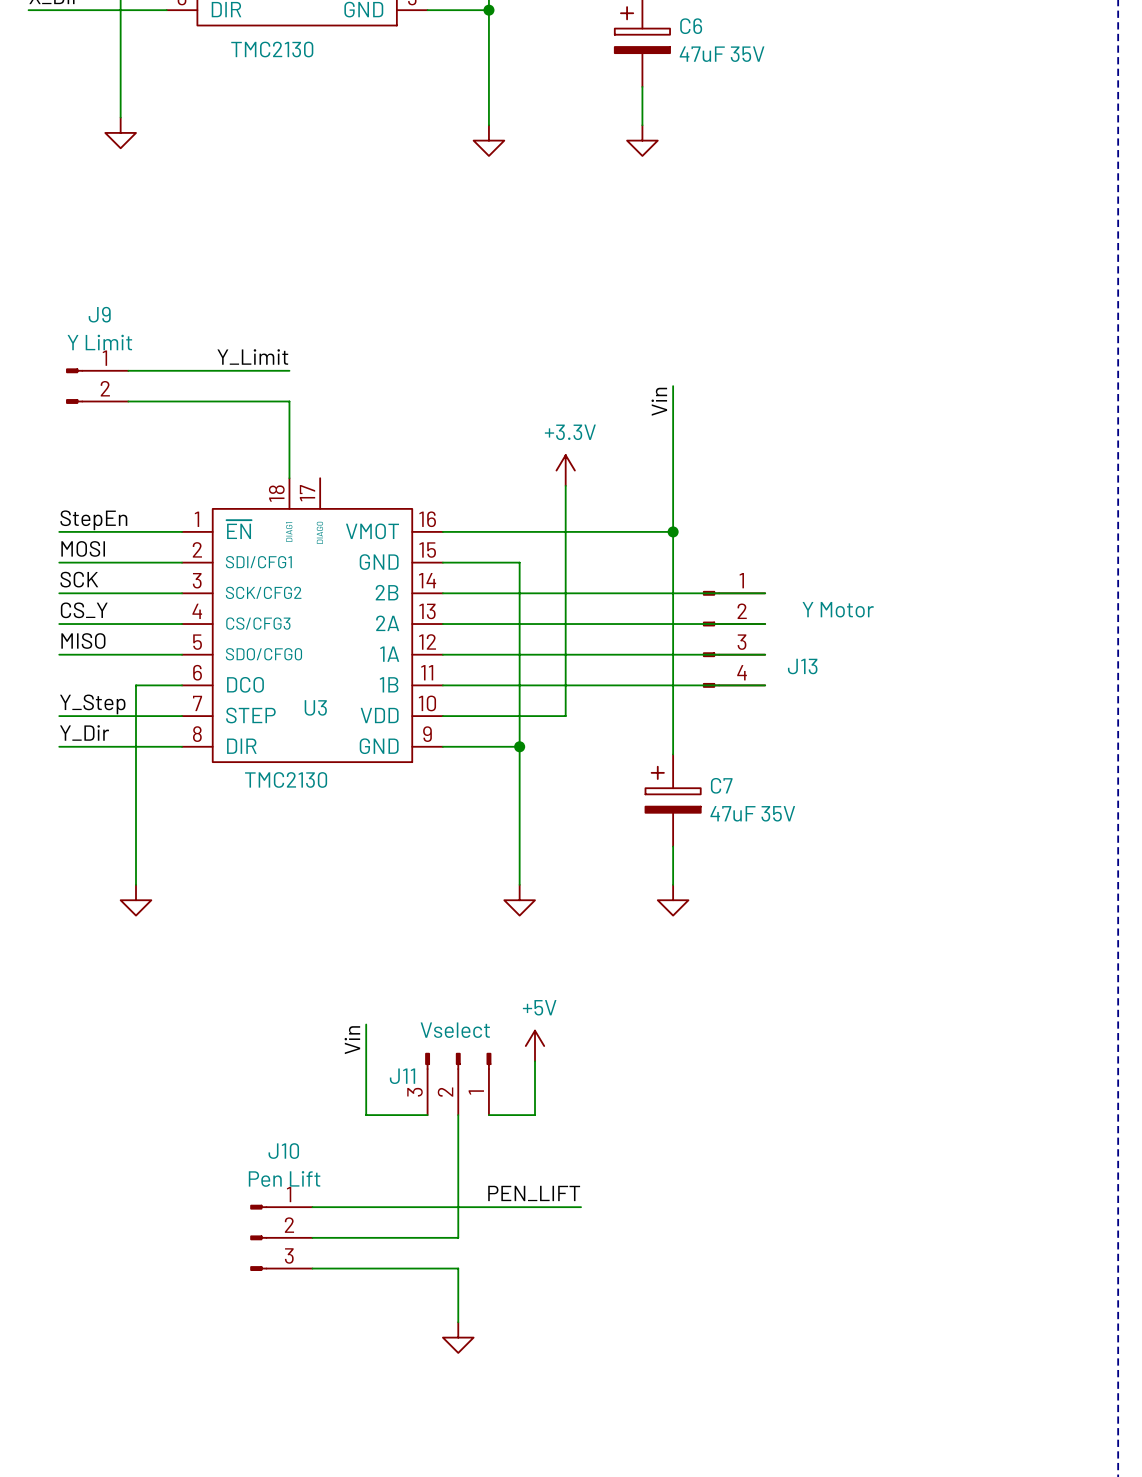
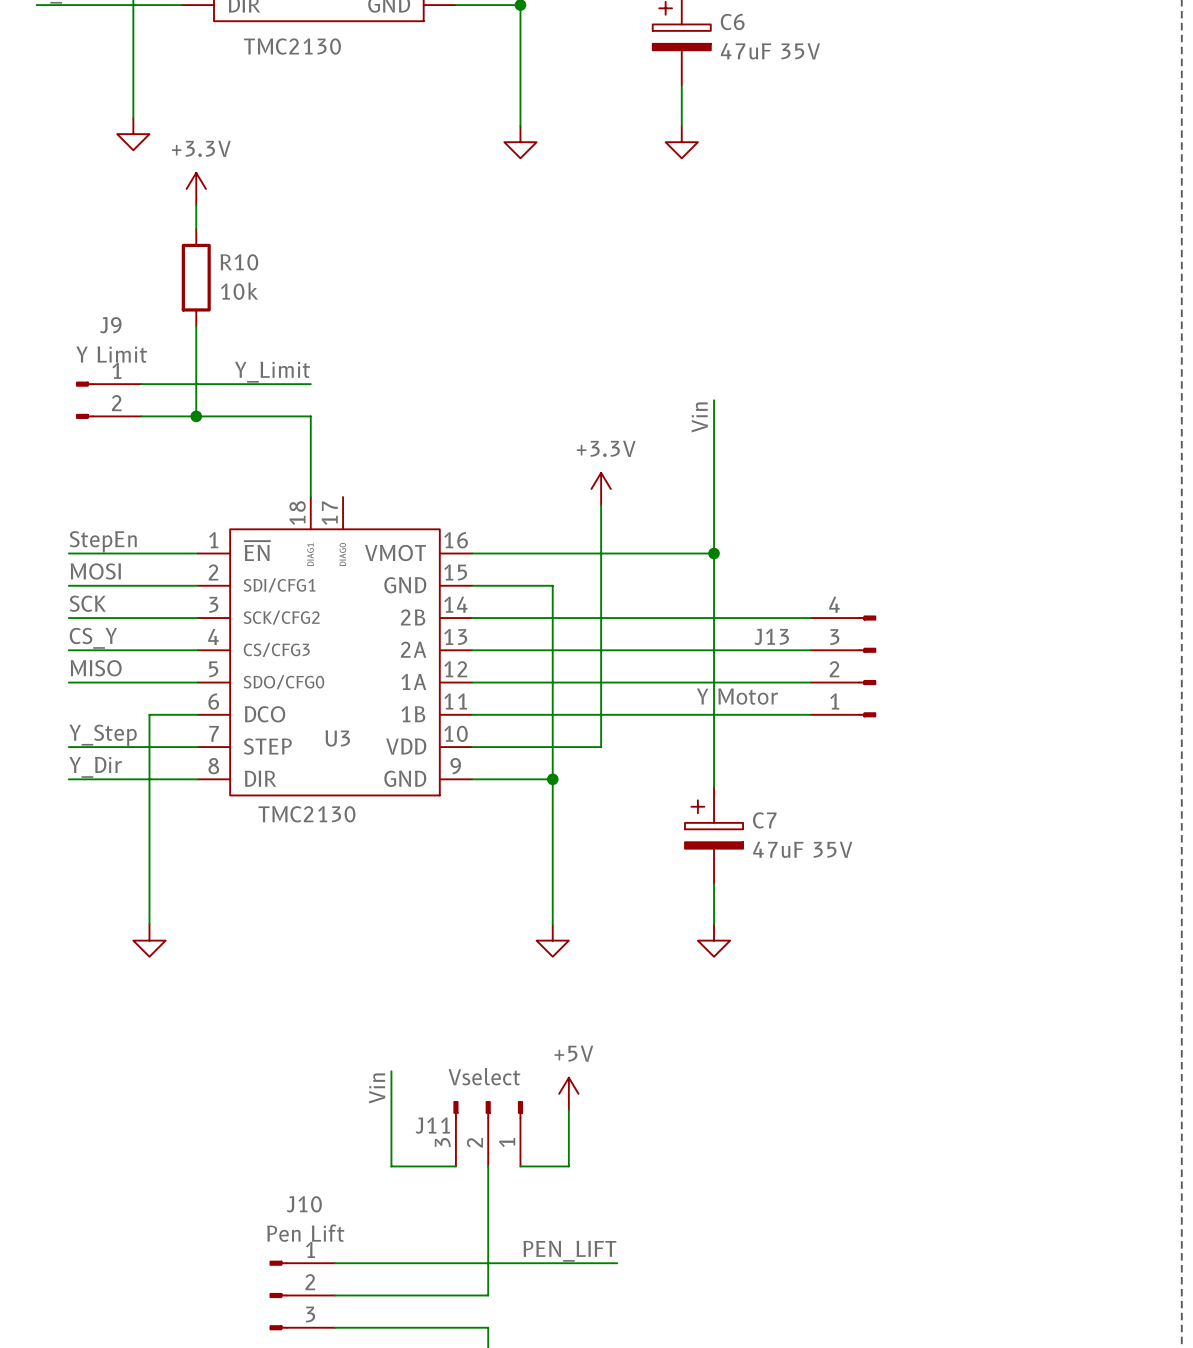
power symbol: none -> +3.3V (196, 188)
wire: none -> (196, 205) (196, 229)
R10: none -> 10k (196, 277)
wire: none -> (196, 326) (196, 416)
junction: none -> (196, 416)
J13 rotation: 0° (711, 639) -> 180° (867, 666)
J13 position: (734, 639) -> (843, 666)

